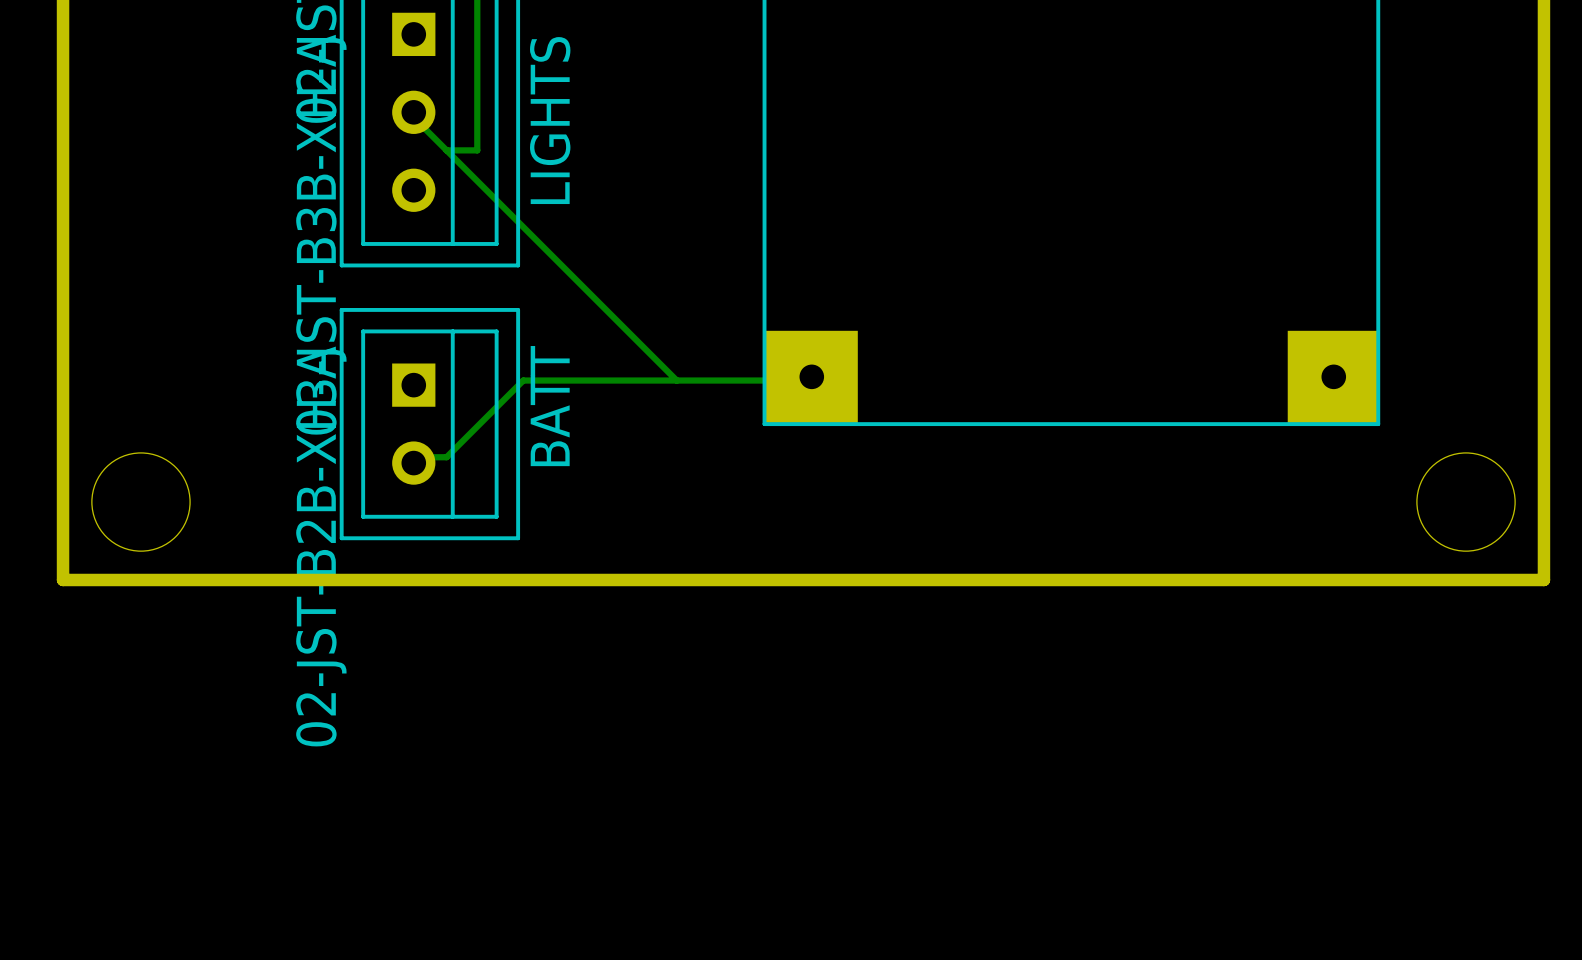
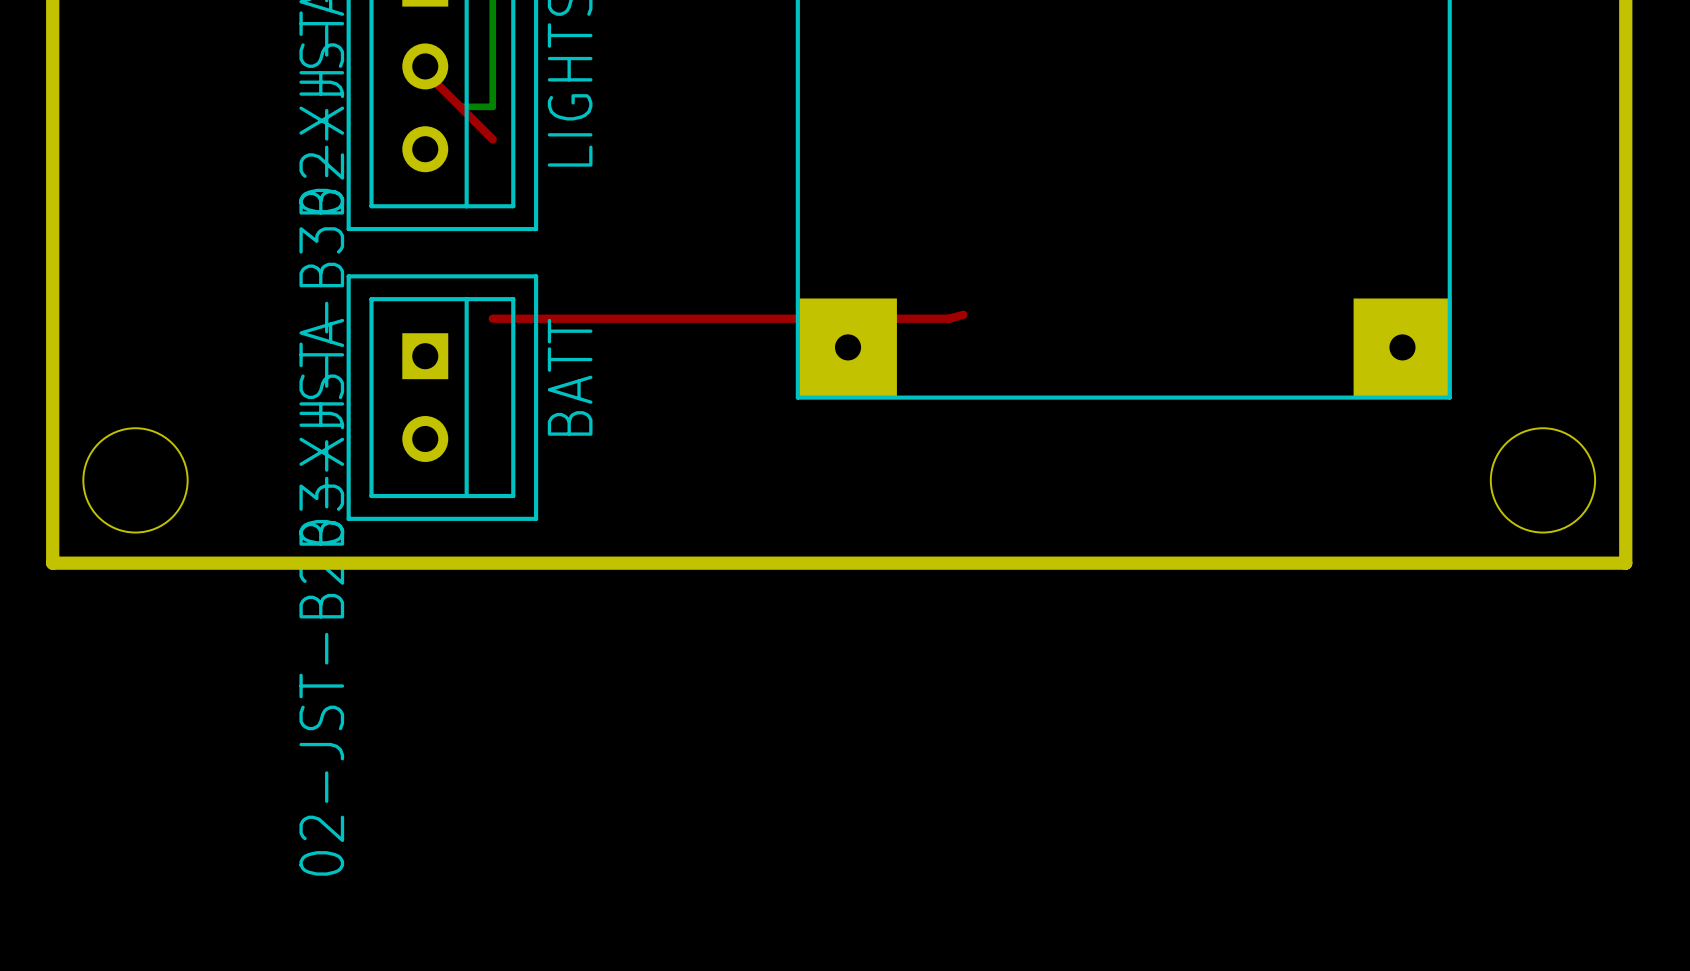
bottom track: (413, 112) (415, 119) (676, 380) -> none
top track: none -> (425, 66) (427, 74) (492, 139)
top track: none -> (963, 314) (949, 318) (492, 318)
bottom track: (811, 376) (799, 380) (523, 380) (446, 457) (415, 457) (413, 463) -> none

